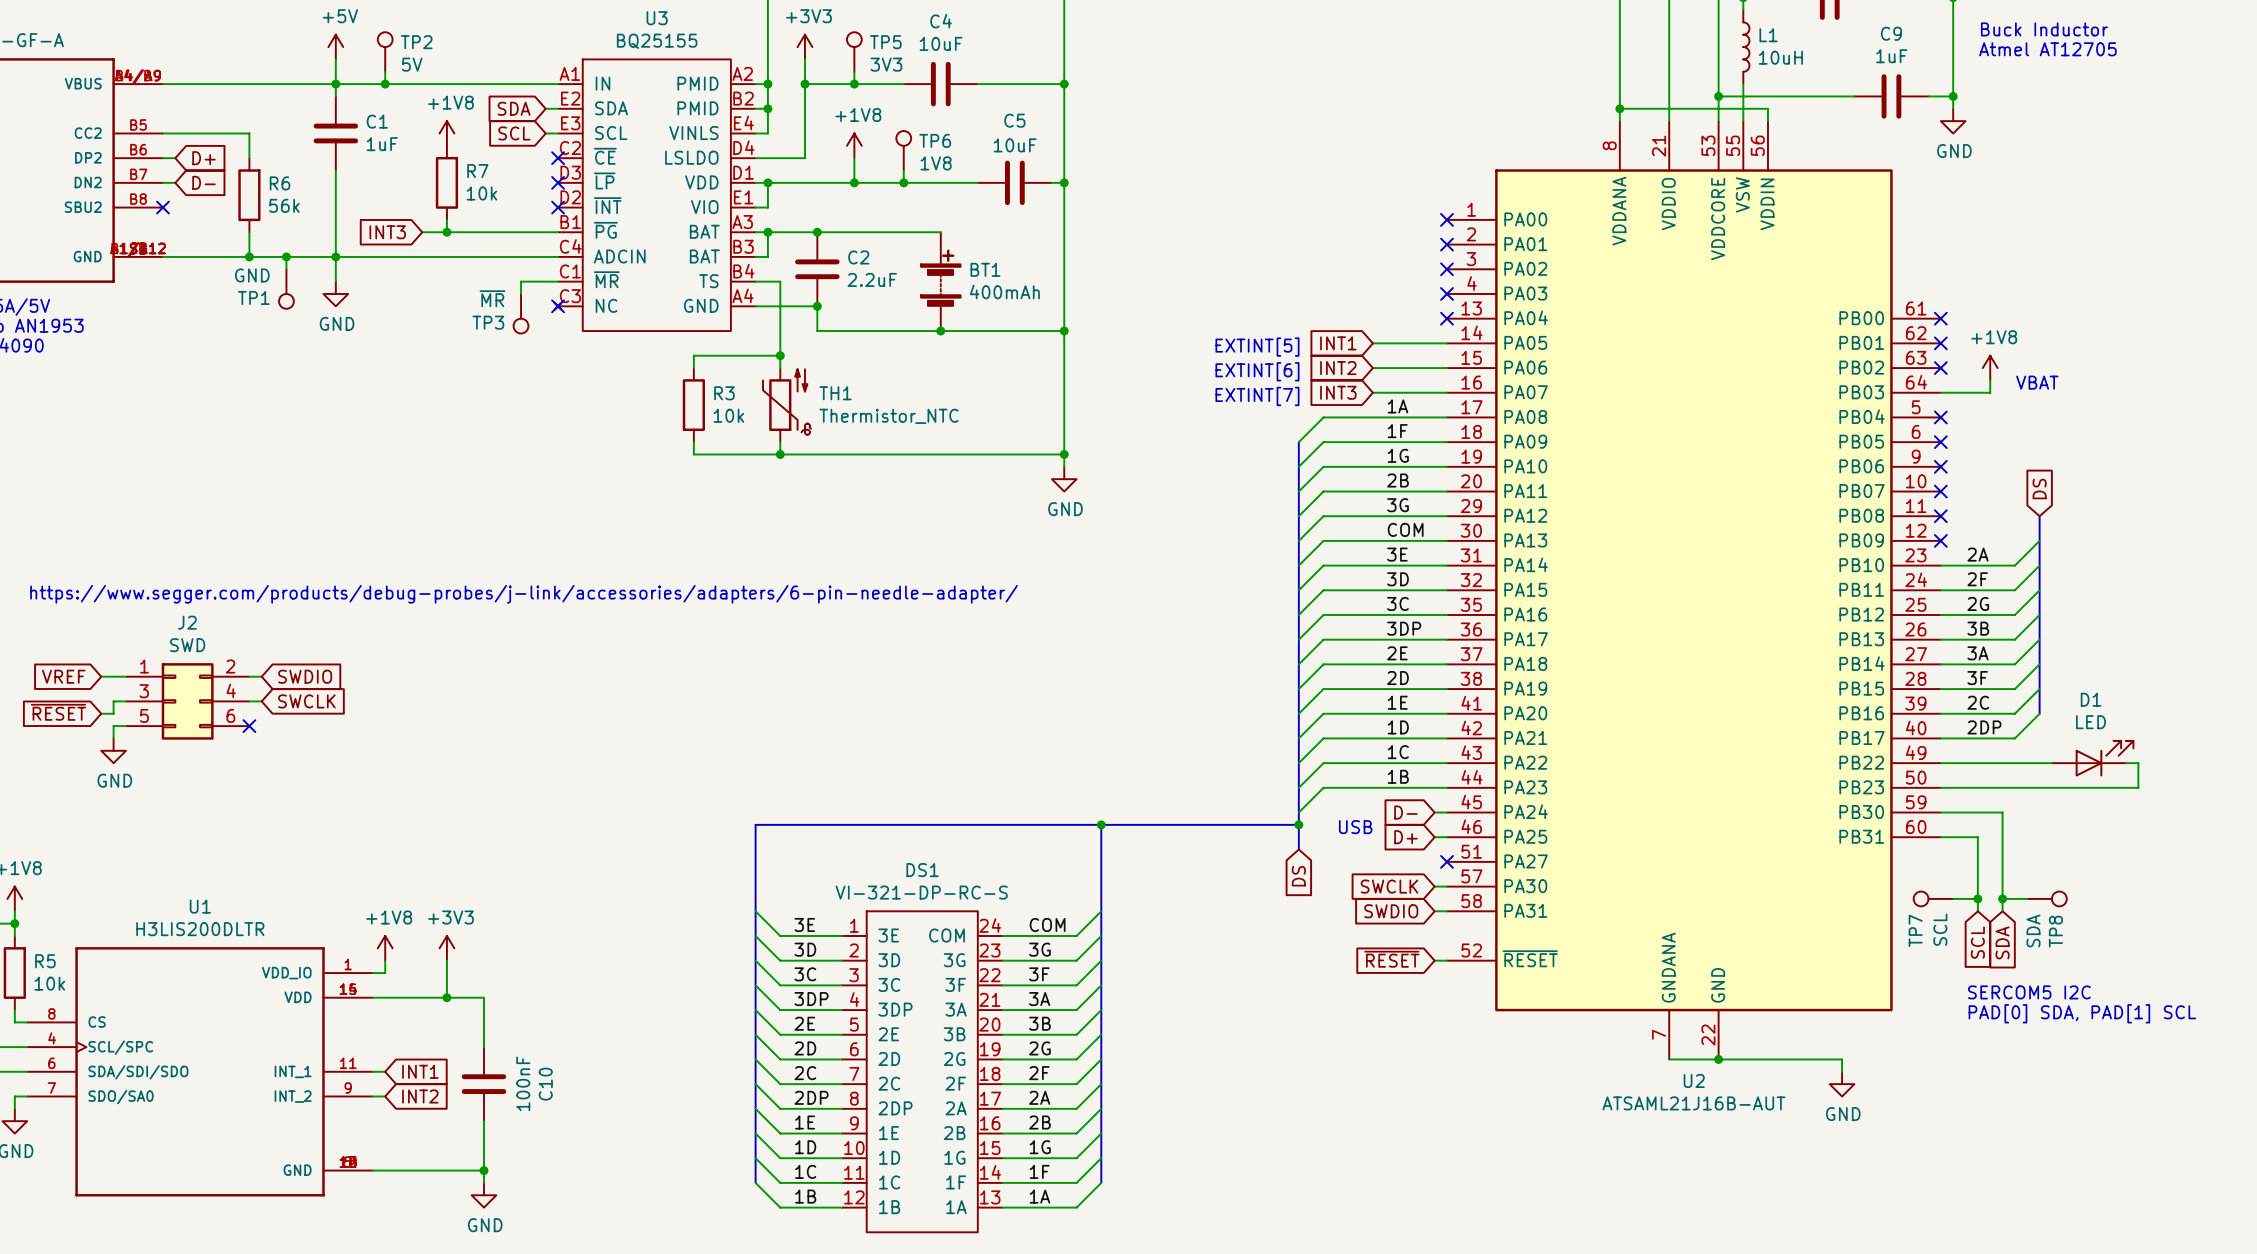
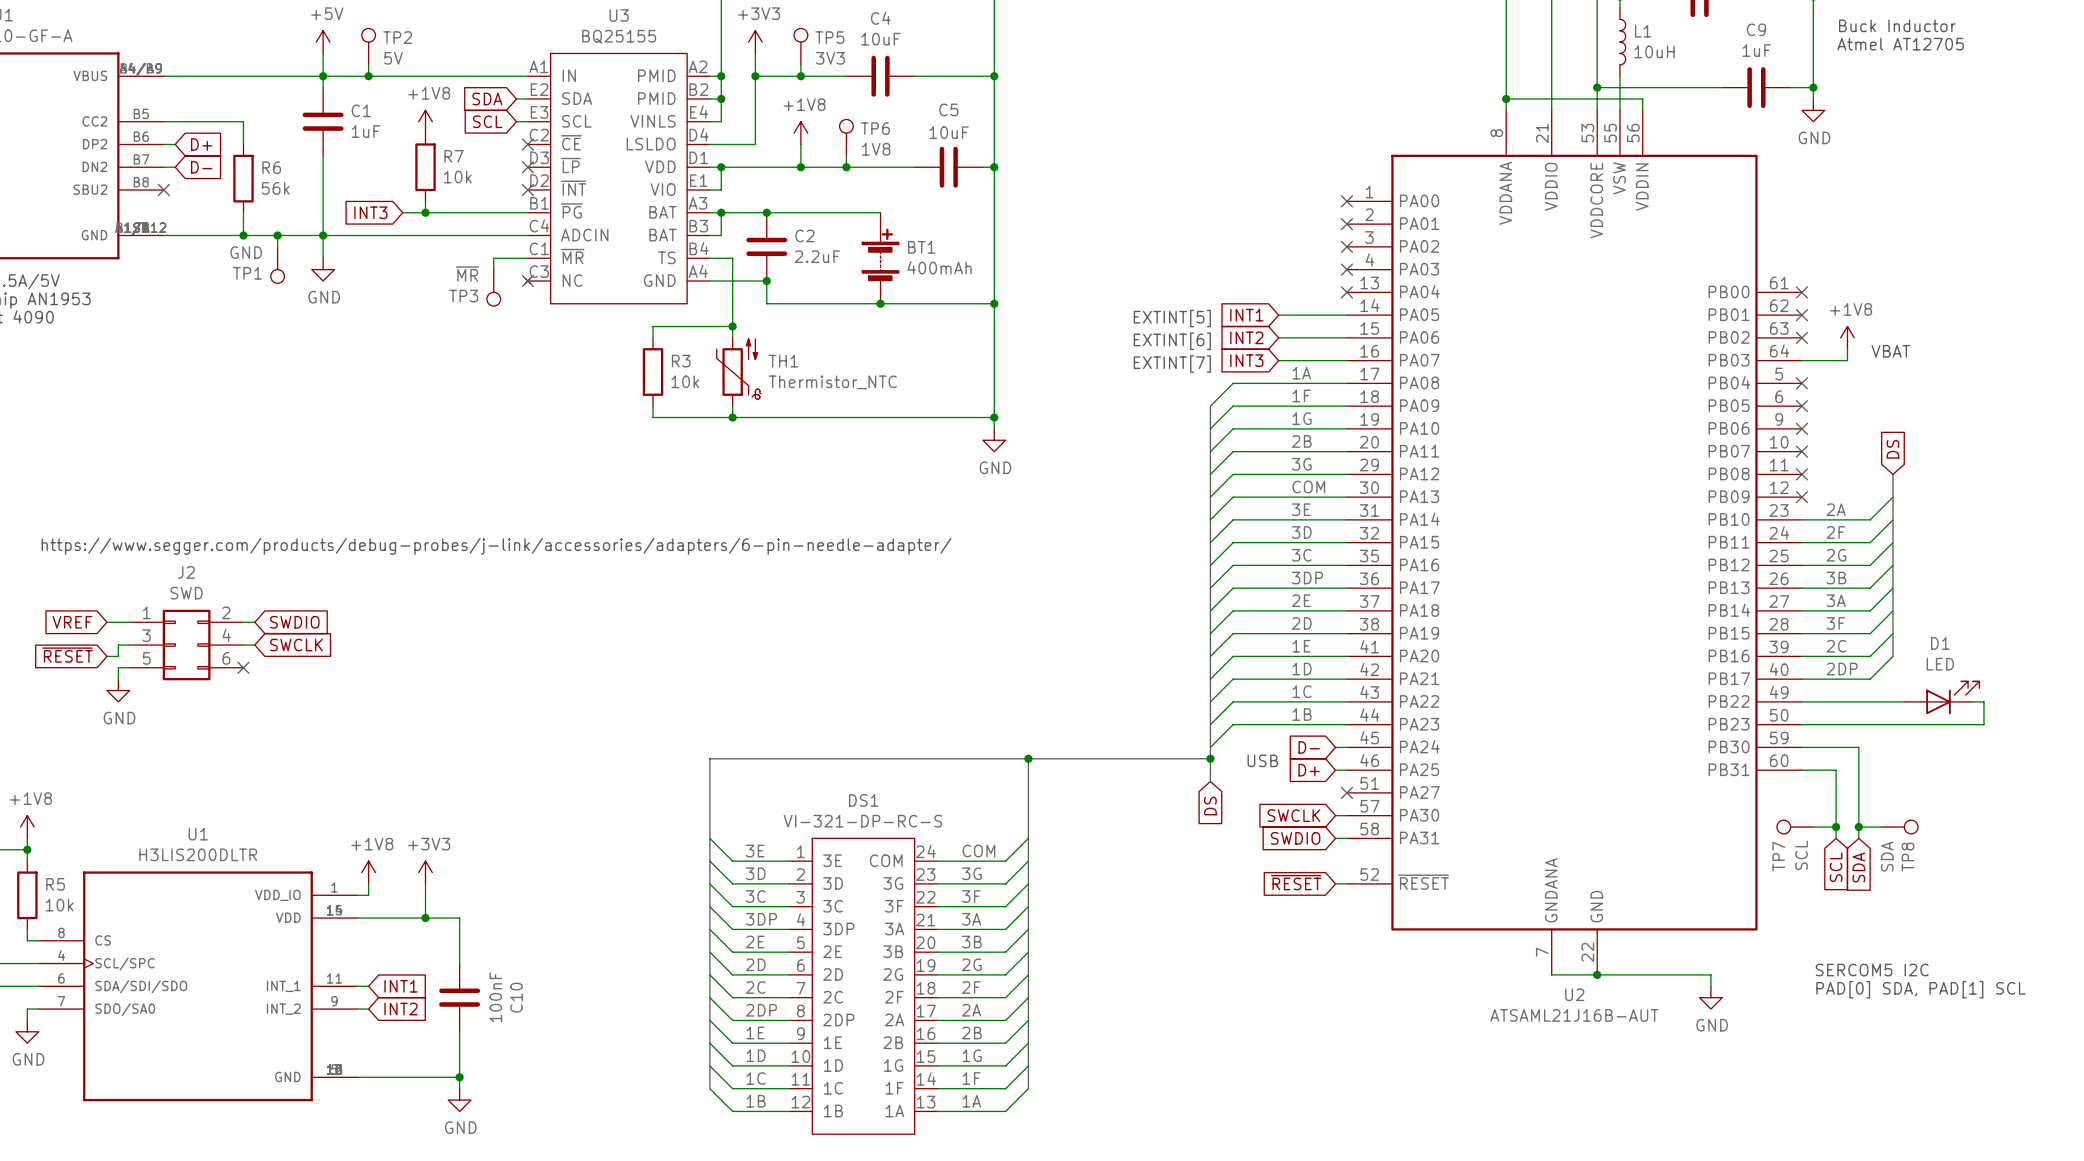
text position: SERCOM5 I2C (2029, 992) -> SERCOM5 I2C (1872, 970)
text position: PAD[0] SDA, PAD[1] SCL (2082, 1013) -> PAD[0] SDA, PAD[1] SCL (1920, 989)

